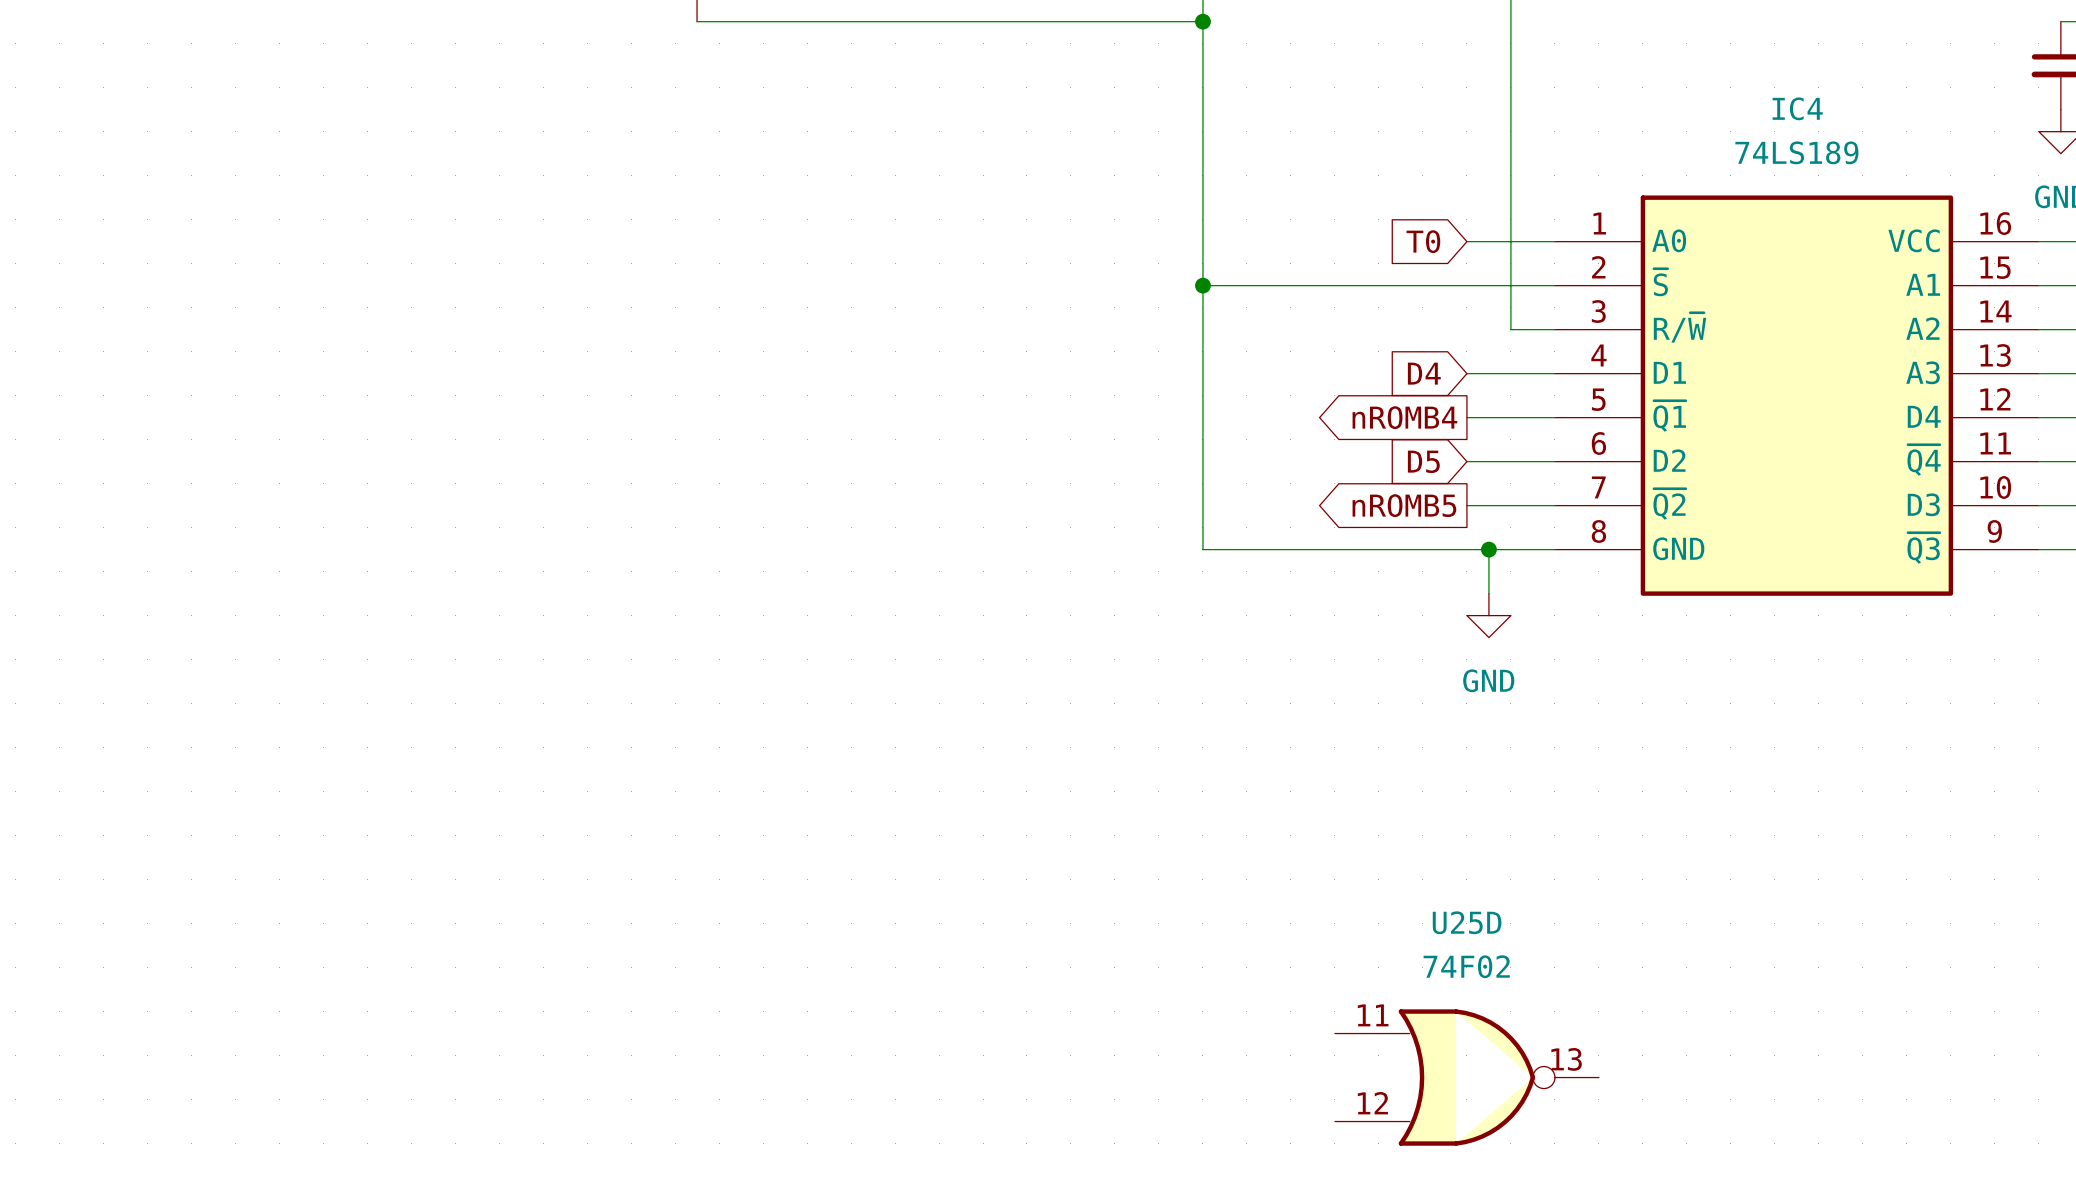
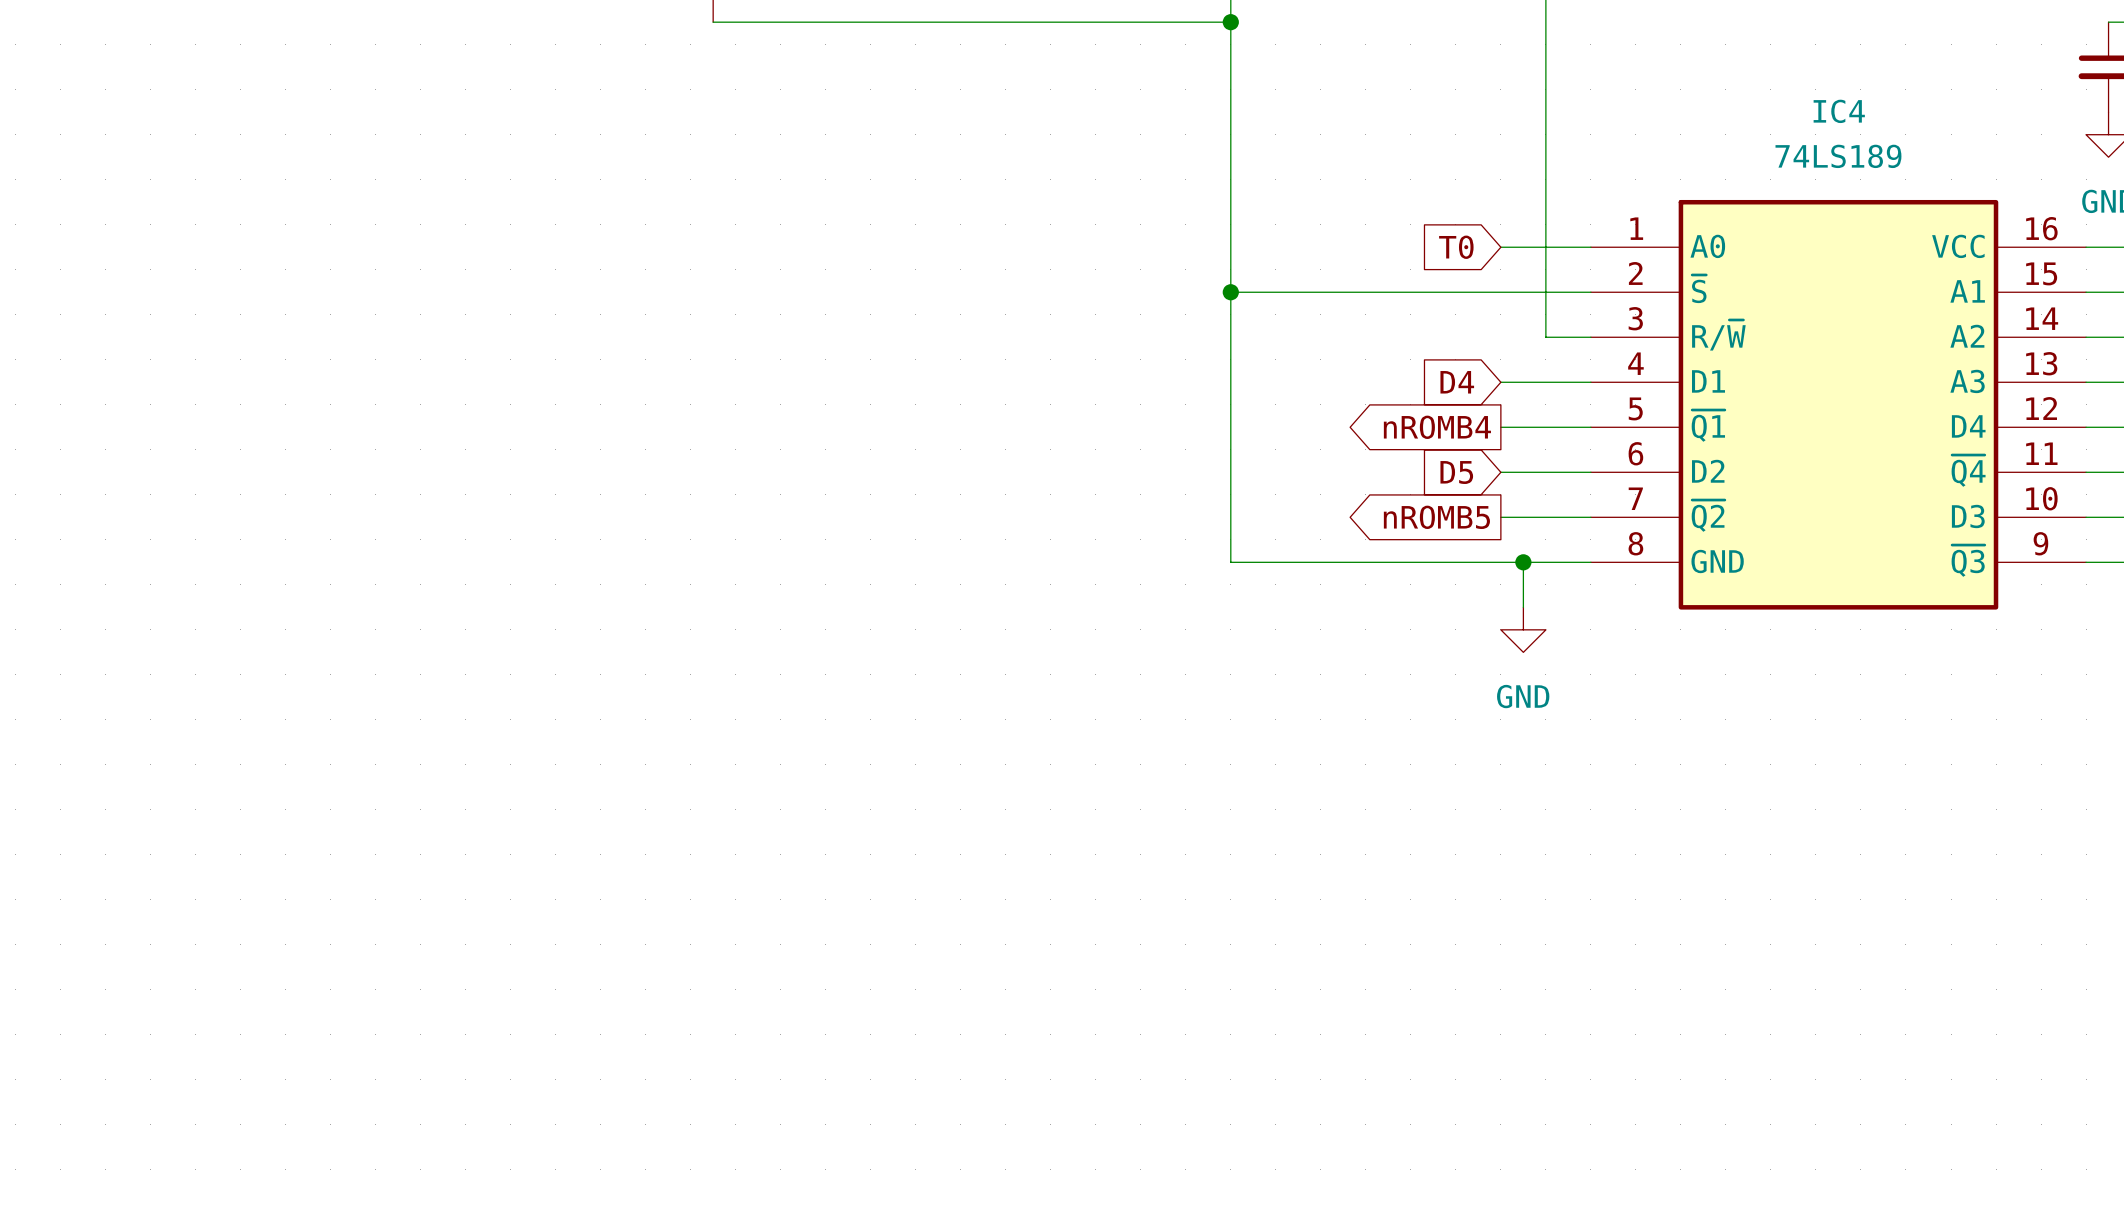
U25D: 74F02 (1466, 1077) -> none

